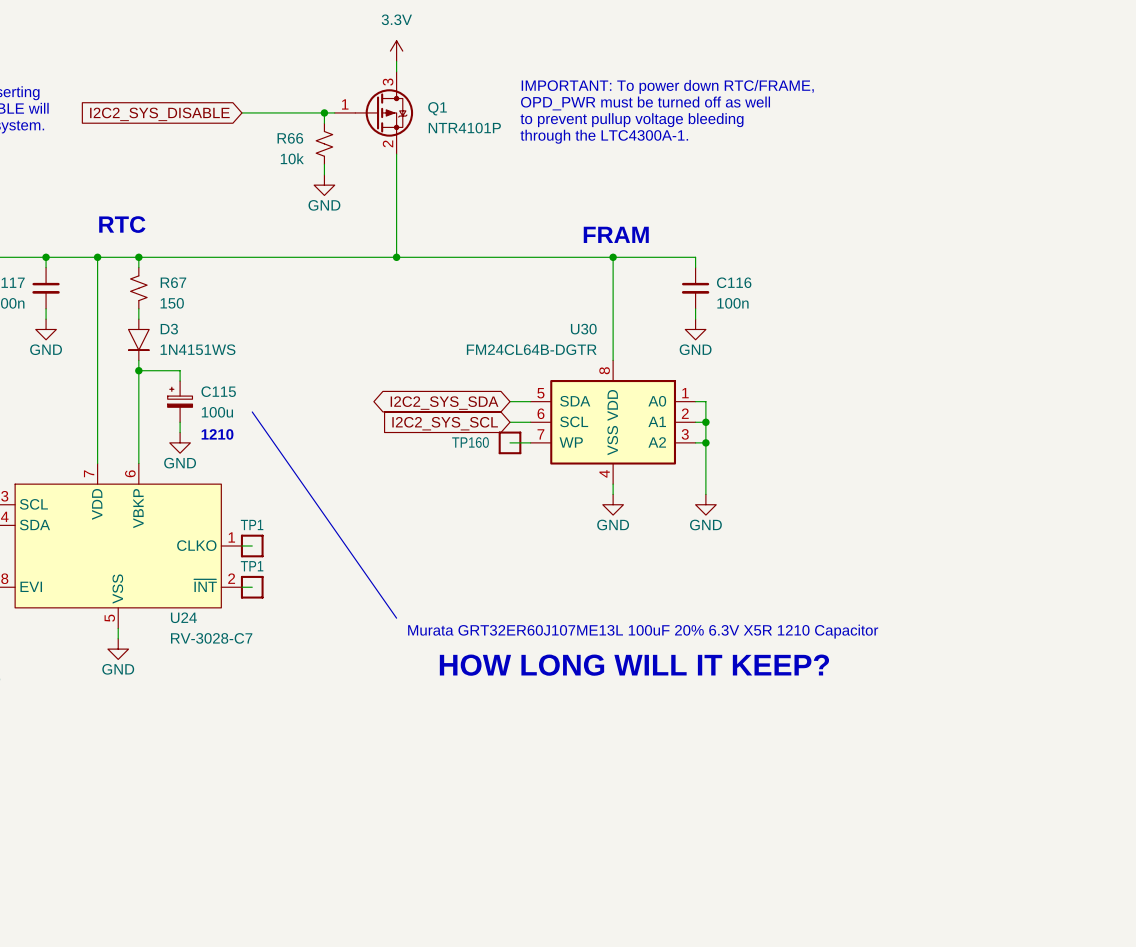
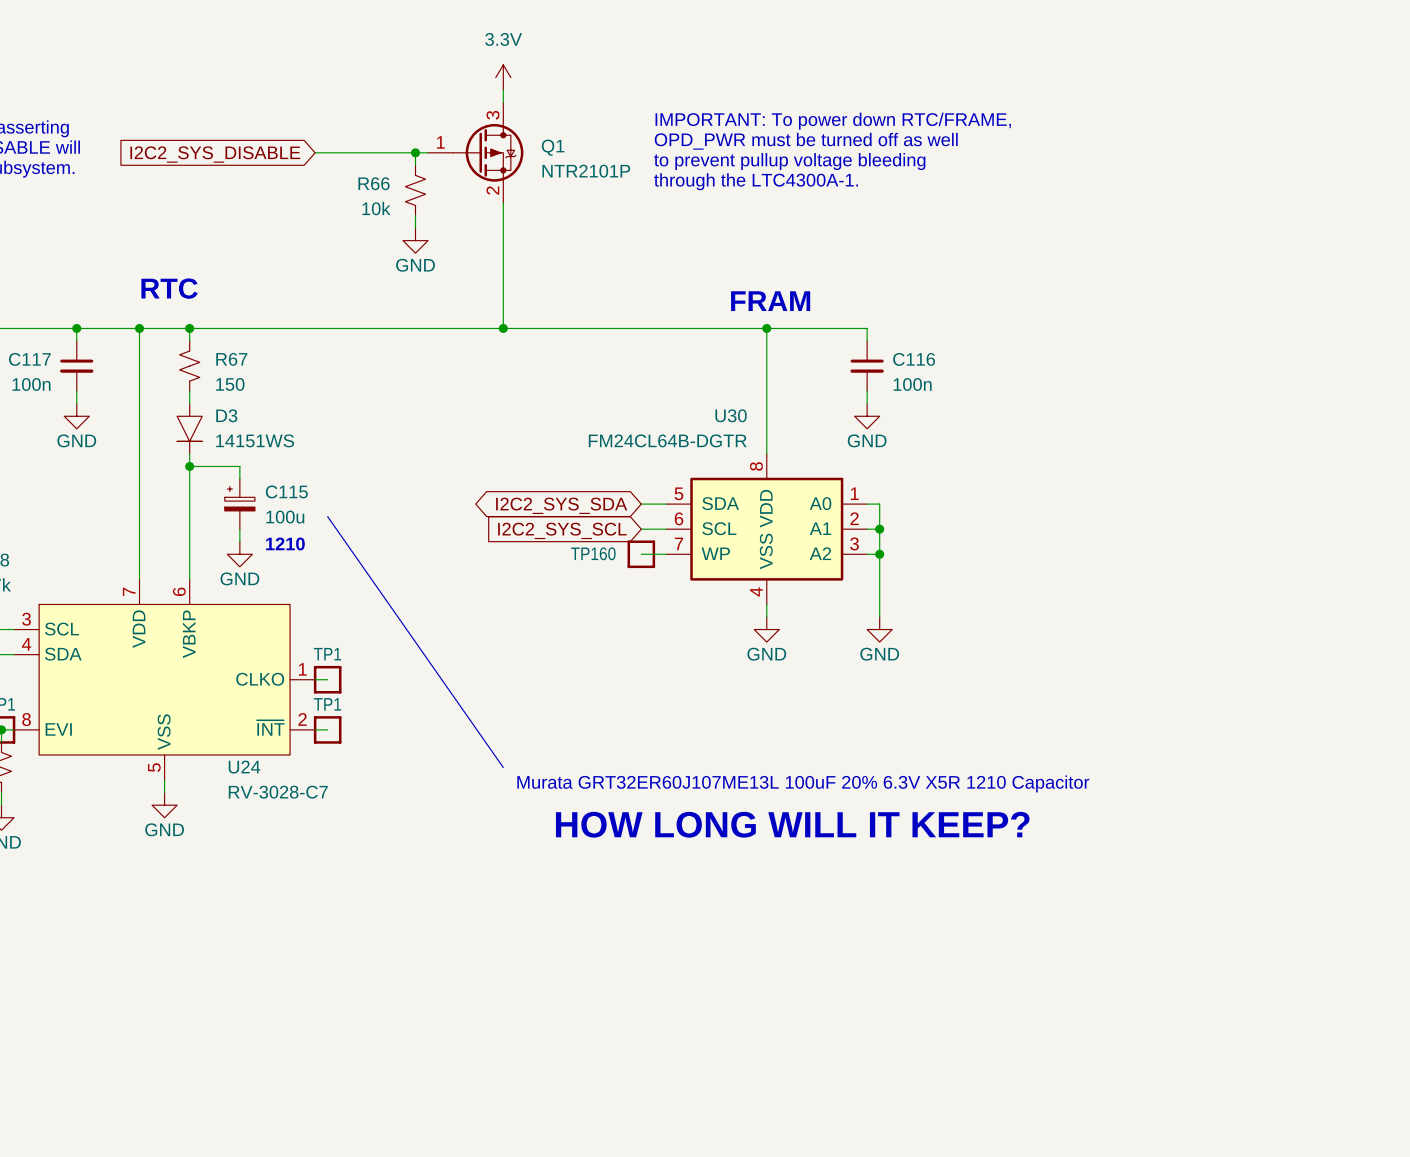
Q1 value: NTR4101P (464, 128) -> NTR2101P (586, 171)
D3 value: 1N4151WS (198, 349) -> 14151WS (255, 440)

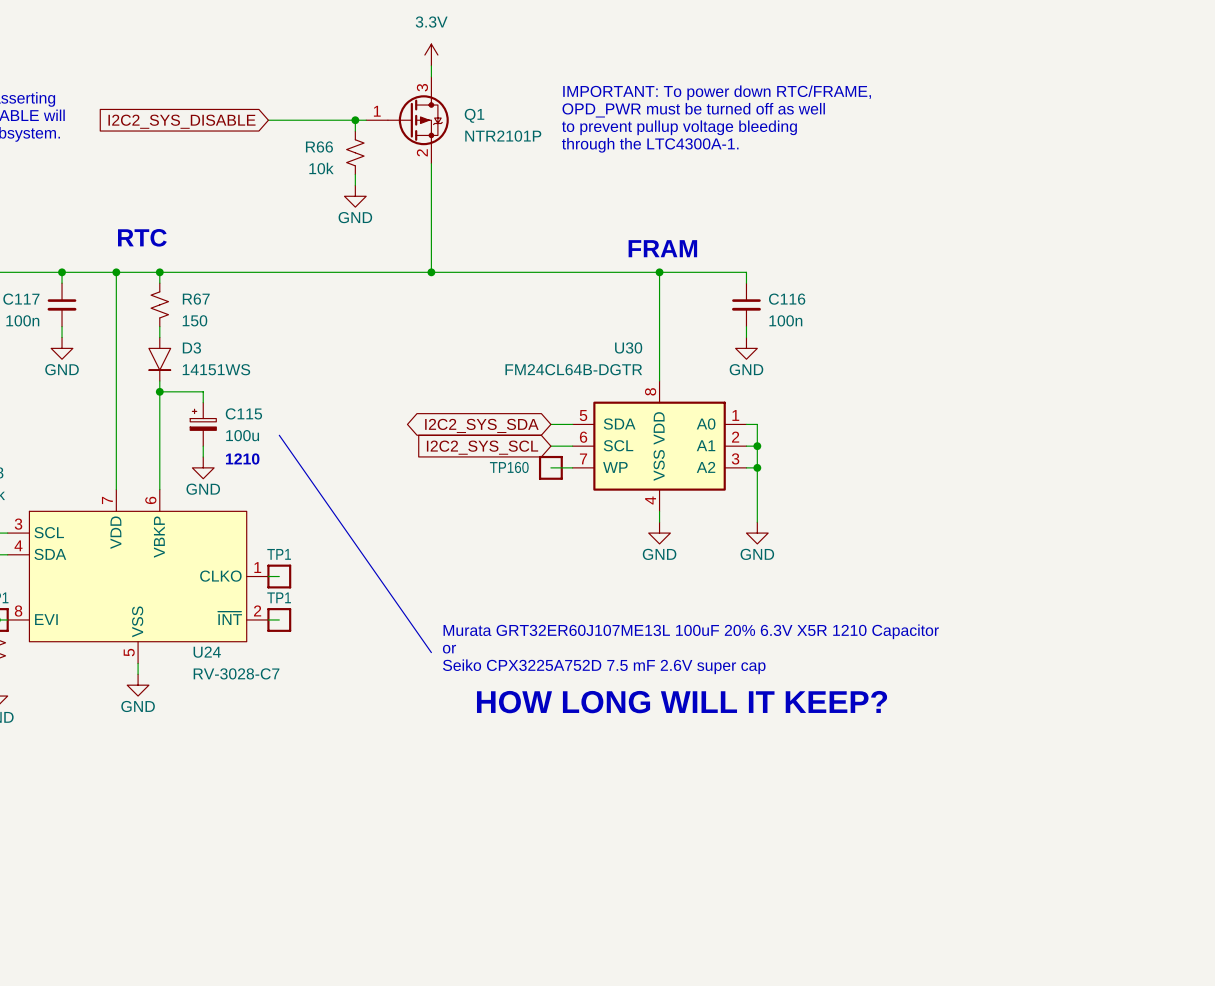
text: none -> Murata GRT32ER60J107ME13L 100uF 20% 6.3V X5R 1210 Capacitor (691, 631)
text: none -> or (449, 649)
text: Murata GRT32ER60J107ME13L 100uF 20% 6.3V X5R 1210 Capacitor (803, 783) -> Seiko CPX3225A752D 7.5 mF 2.6V super cap (604, 666)

